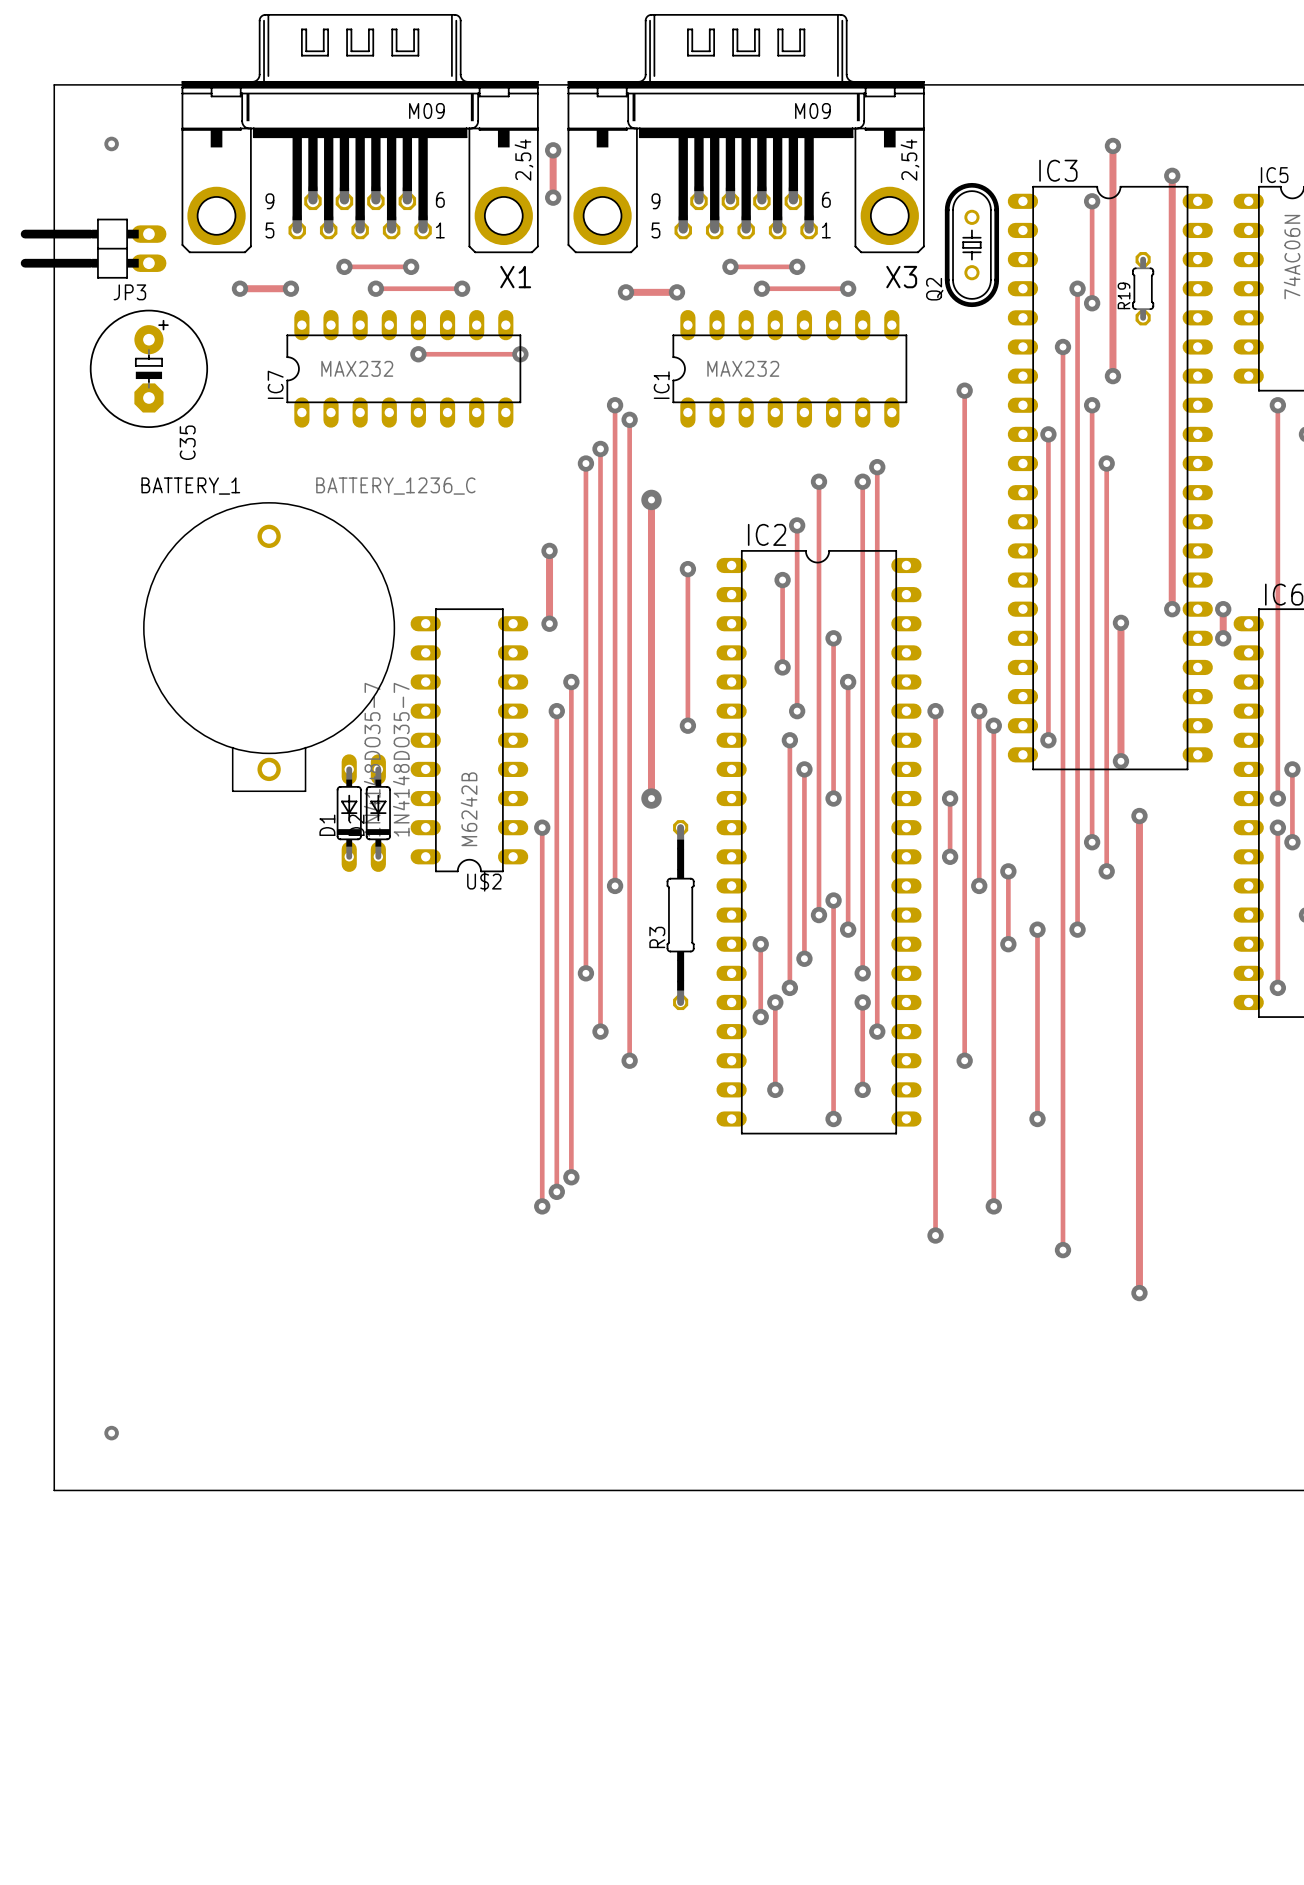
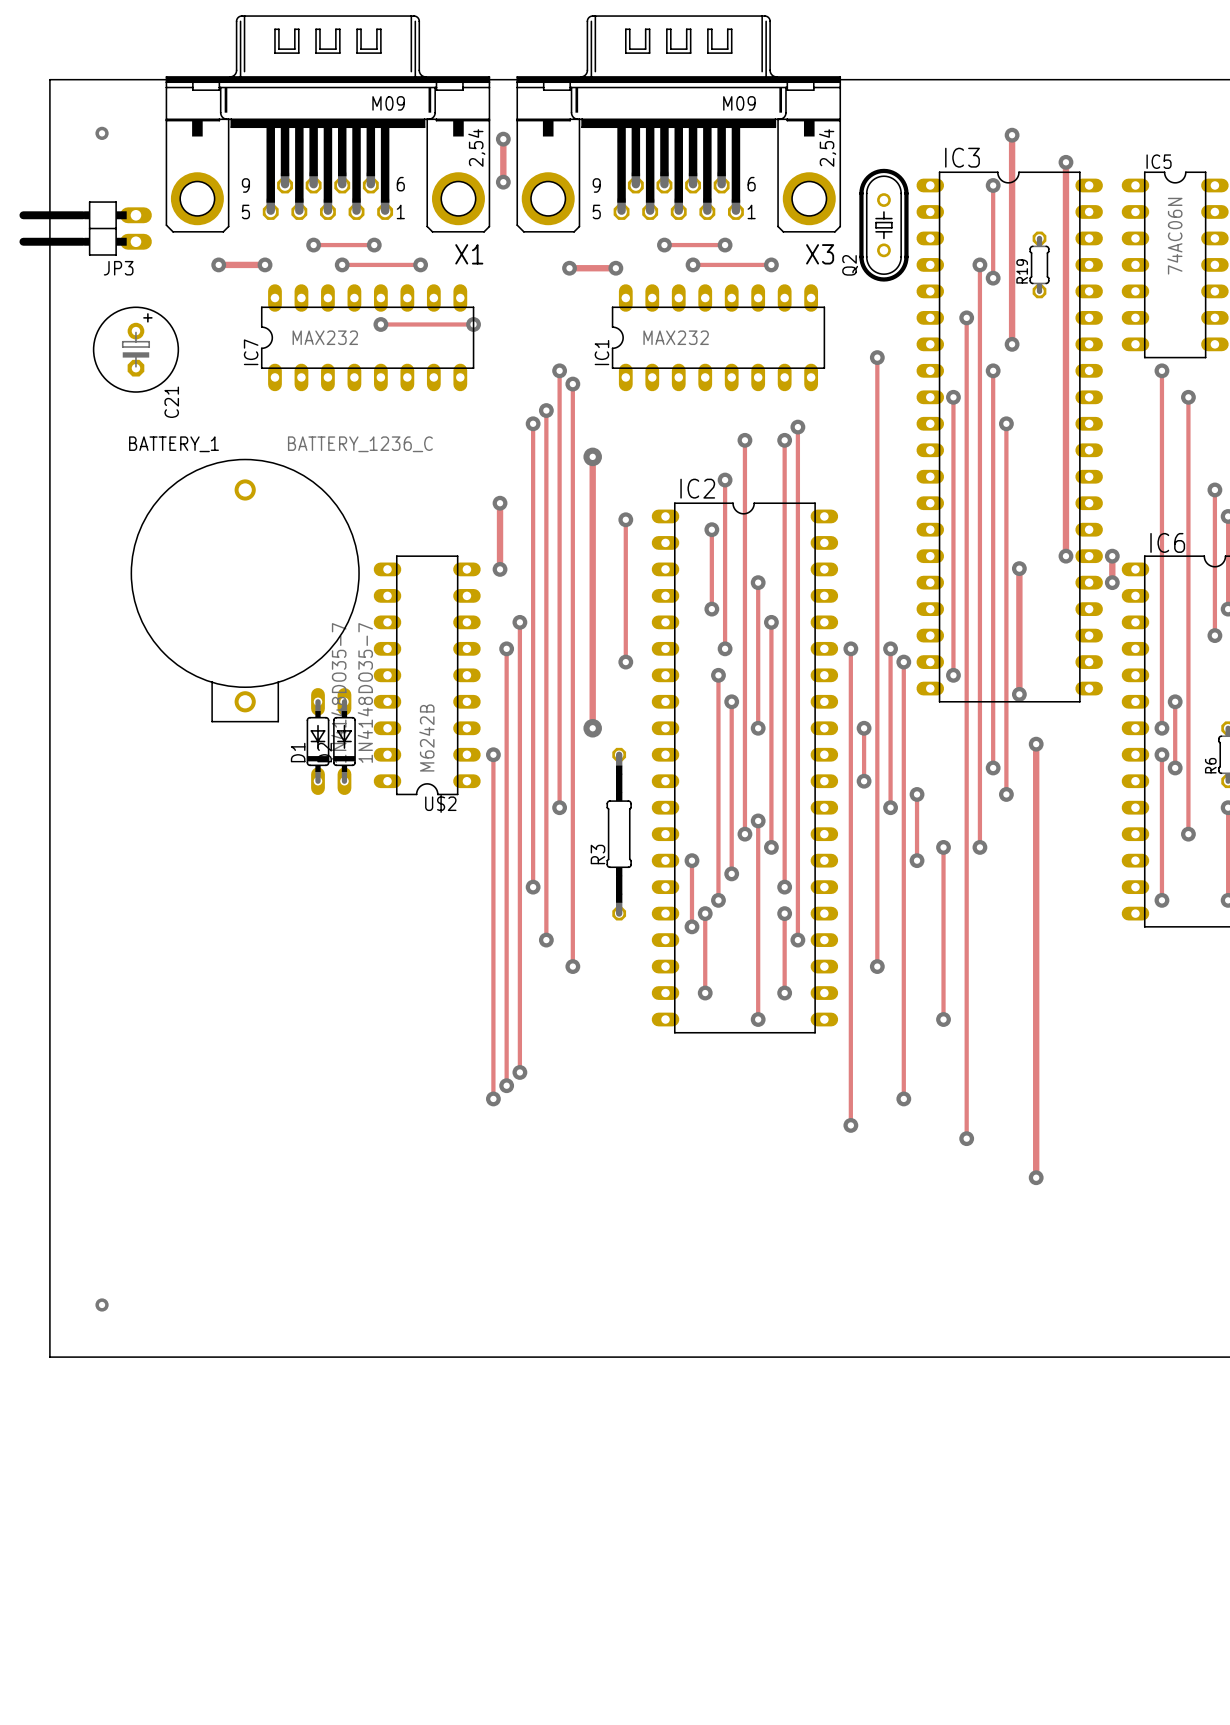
C35: (148, 368) -> none
C21: none -> (135, 349)

